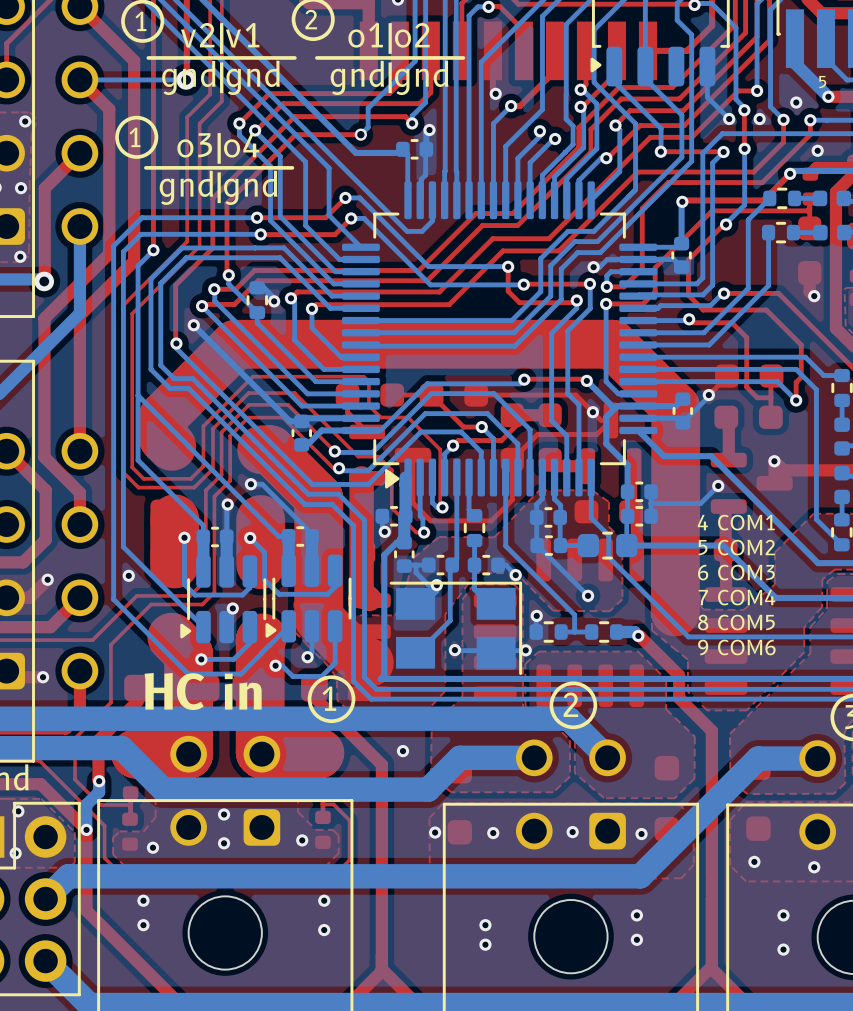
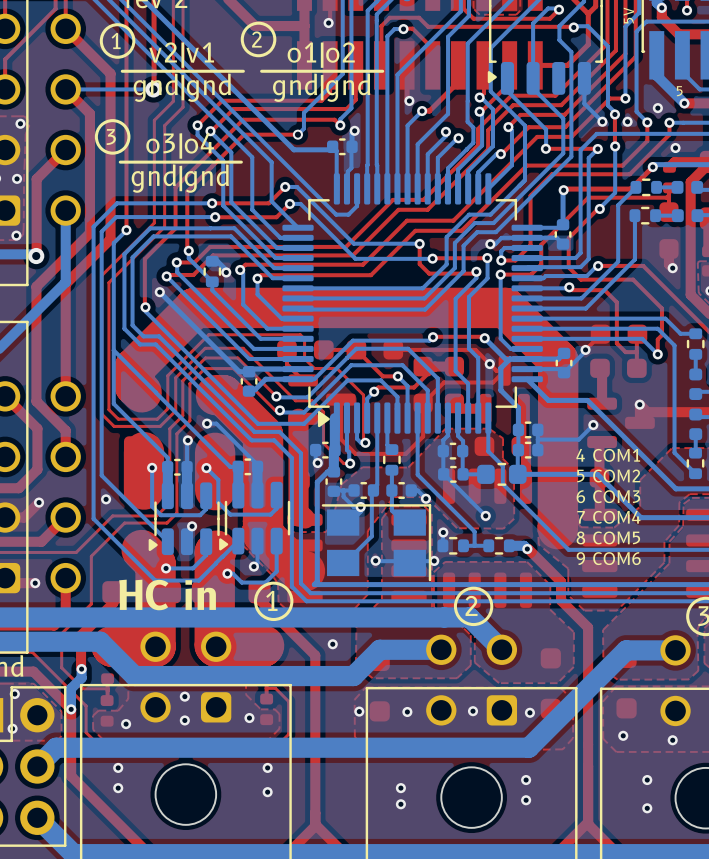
text: 1 (134, 137) -> 3 (111, 137)

